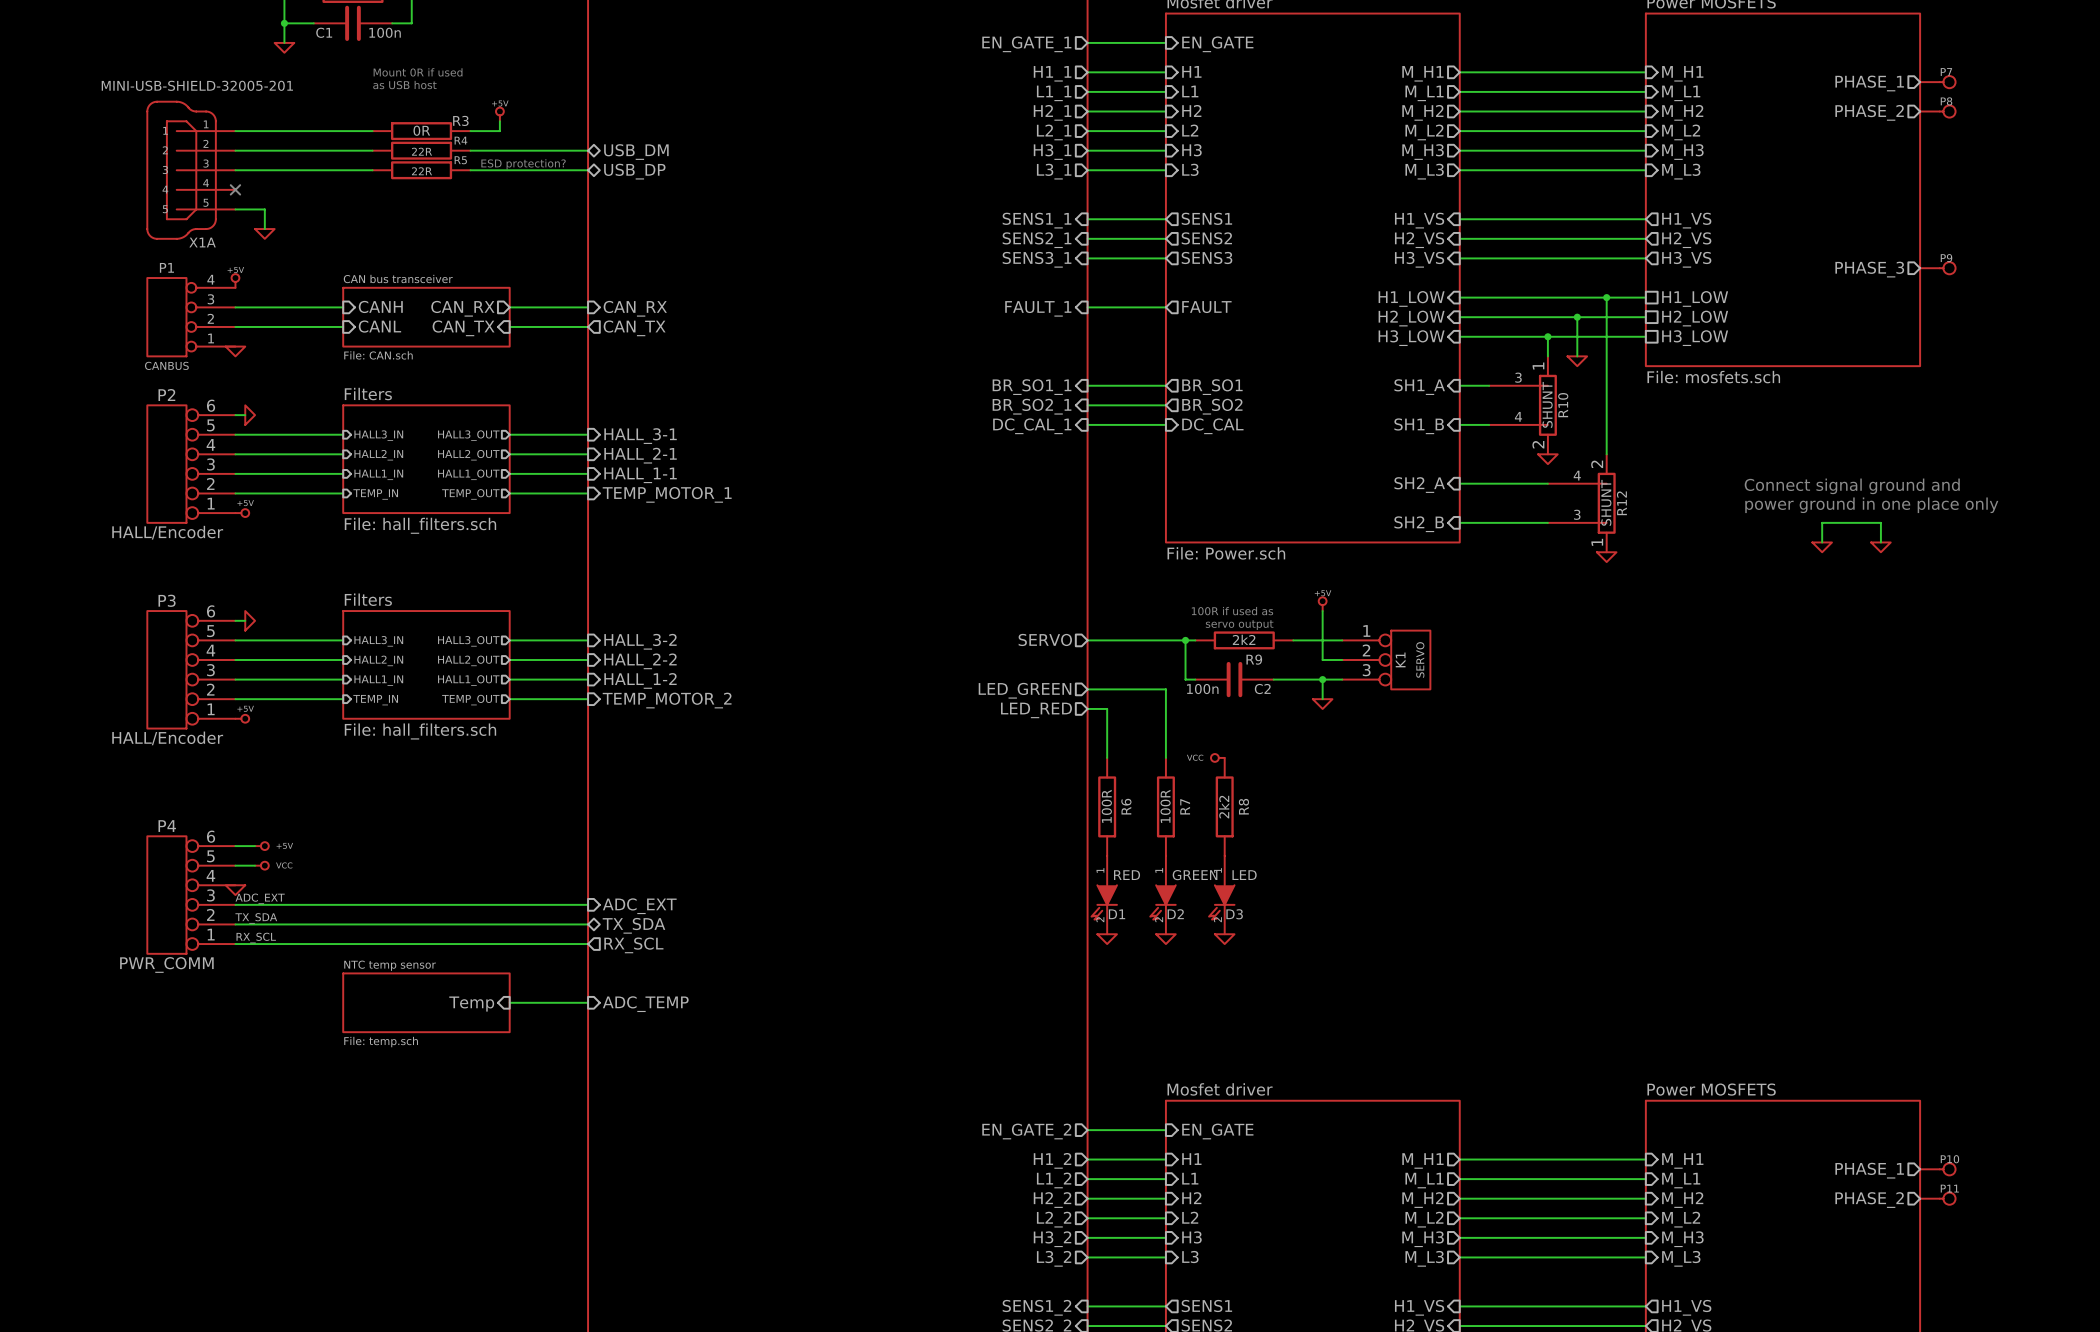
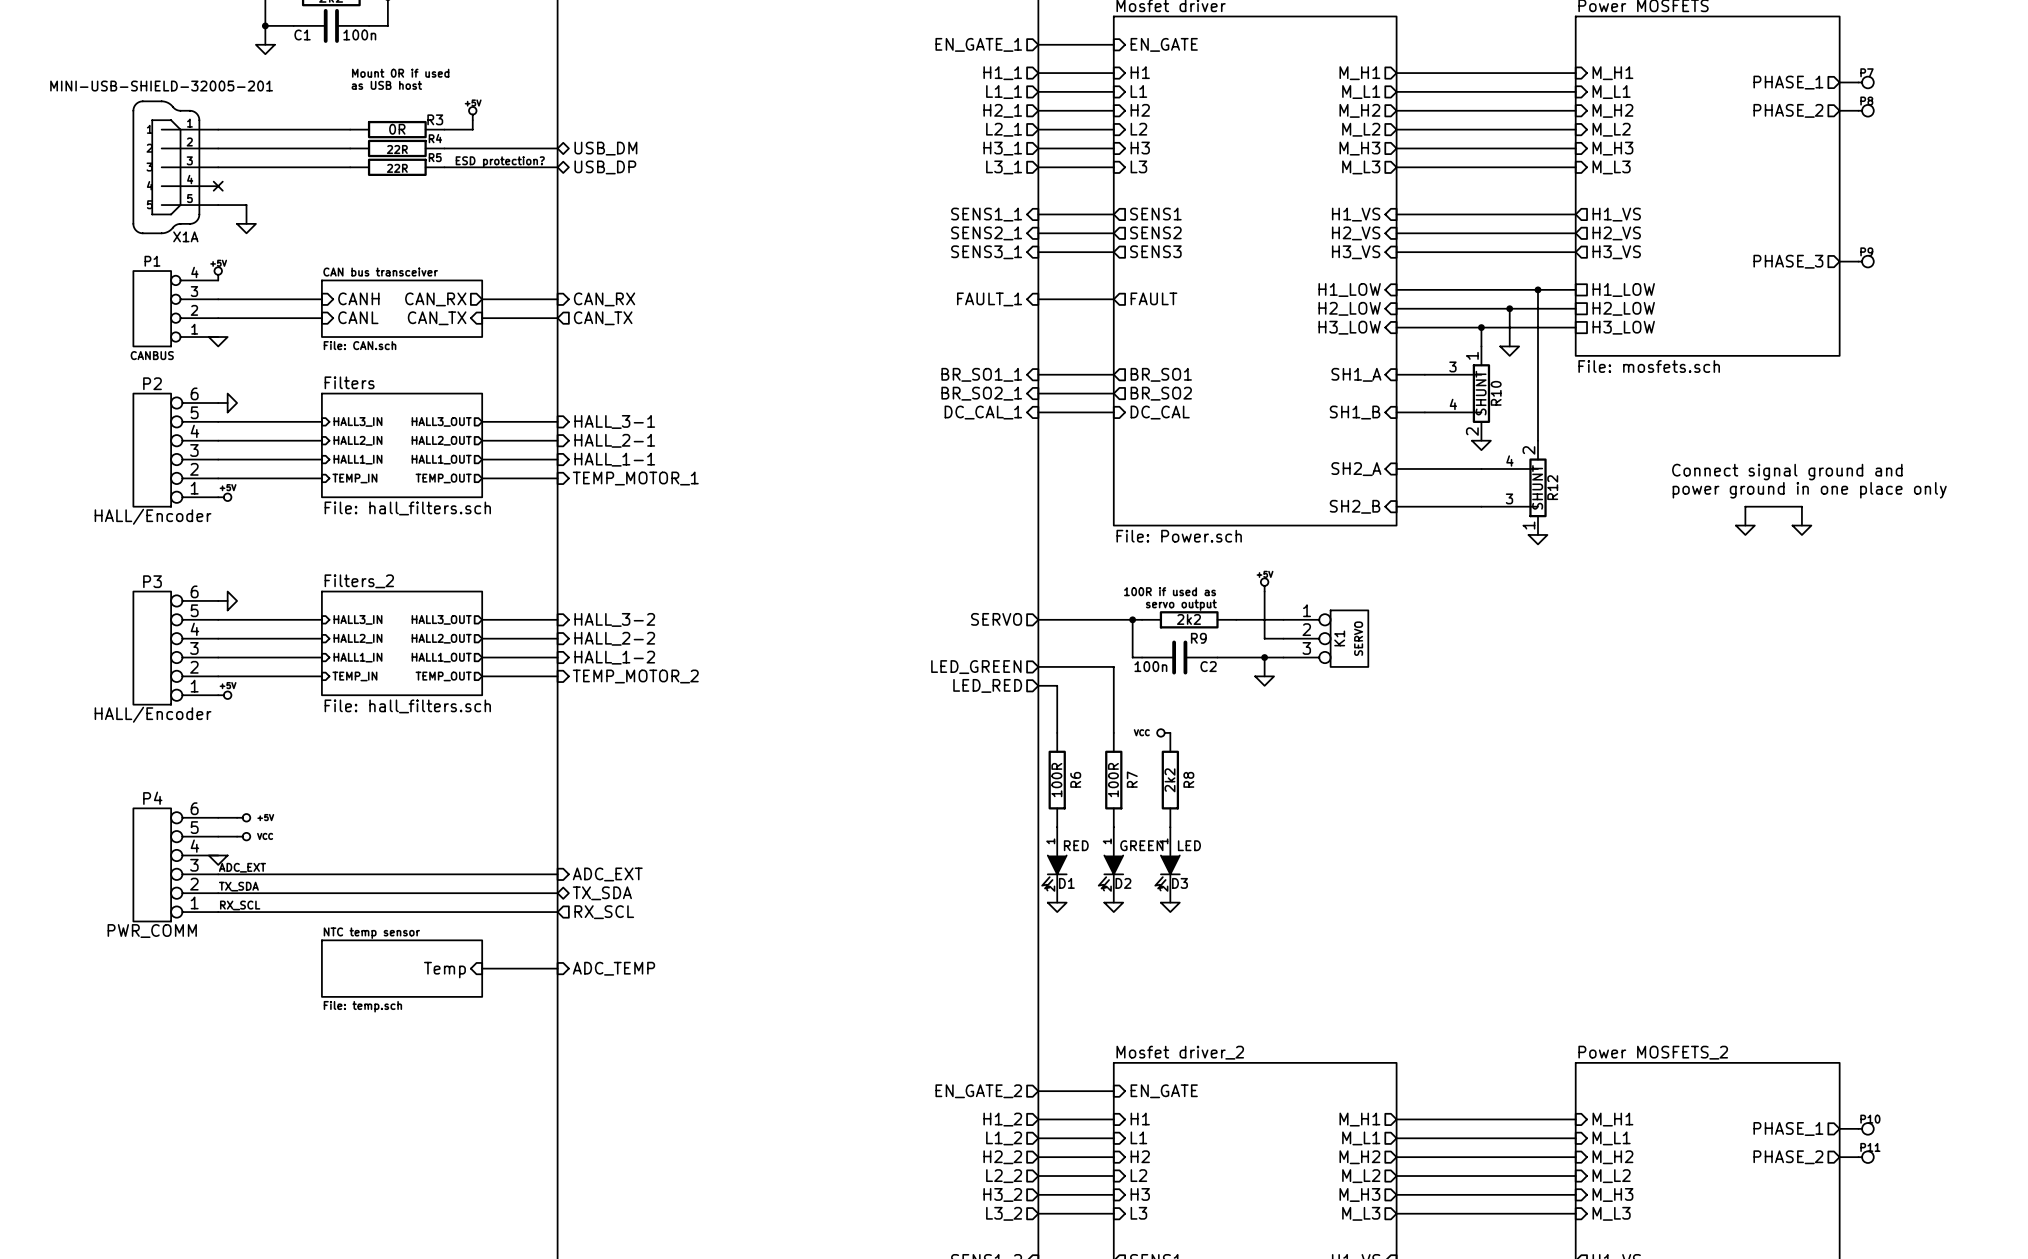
sheet Filters name: Filters (368, 599) -> Filters_2 (359, 581)
sheet Mosfet driver name: Mosfet driver (1220, 1089) -> Mosfet driver_2 (1180, 1052)
sheet Power MOSFETS name: Power MOSFETS (1711, 1089) -> Power MOSFETS_2 (1653, 1052)

